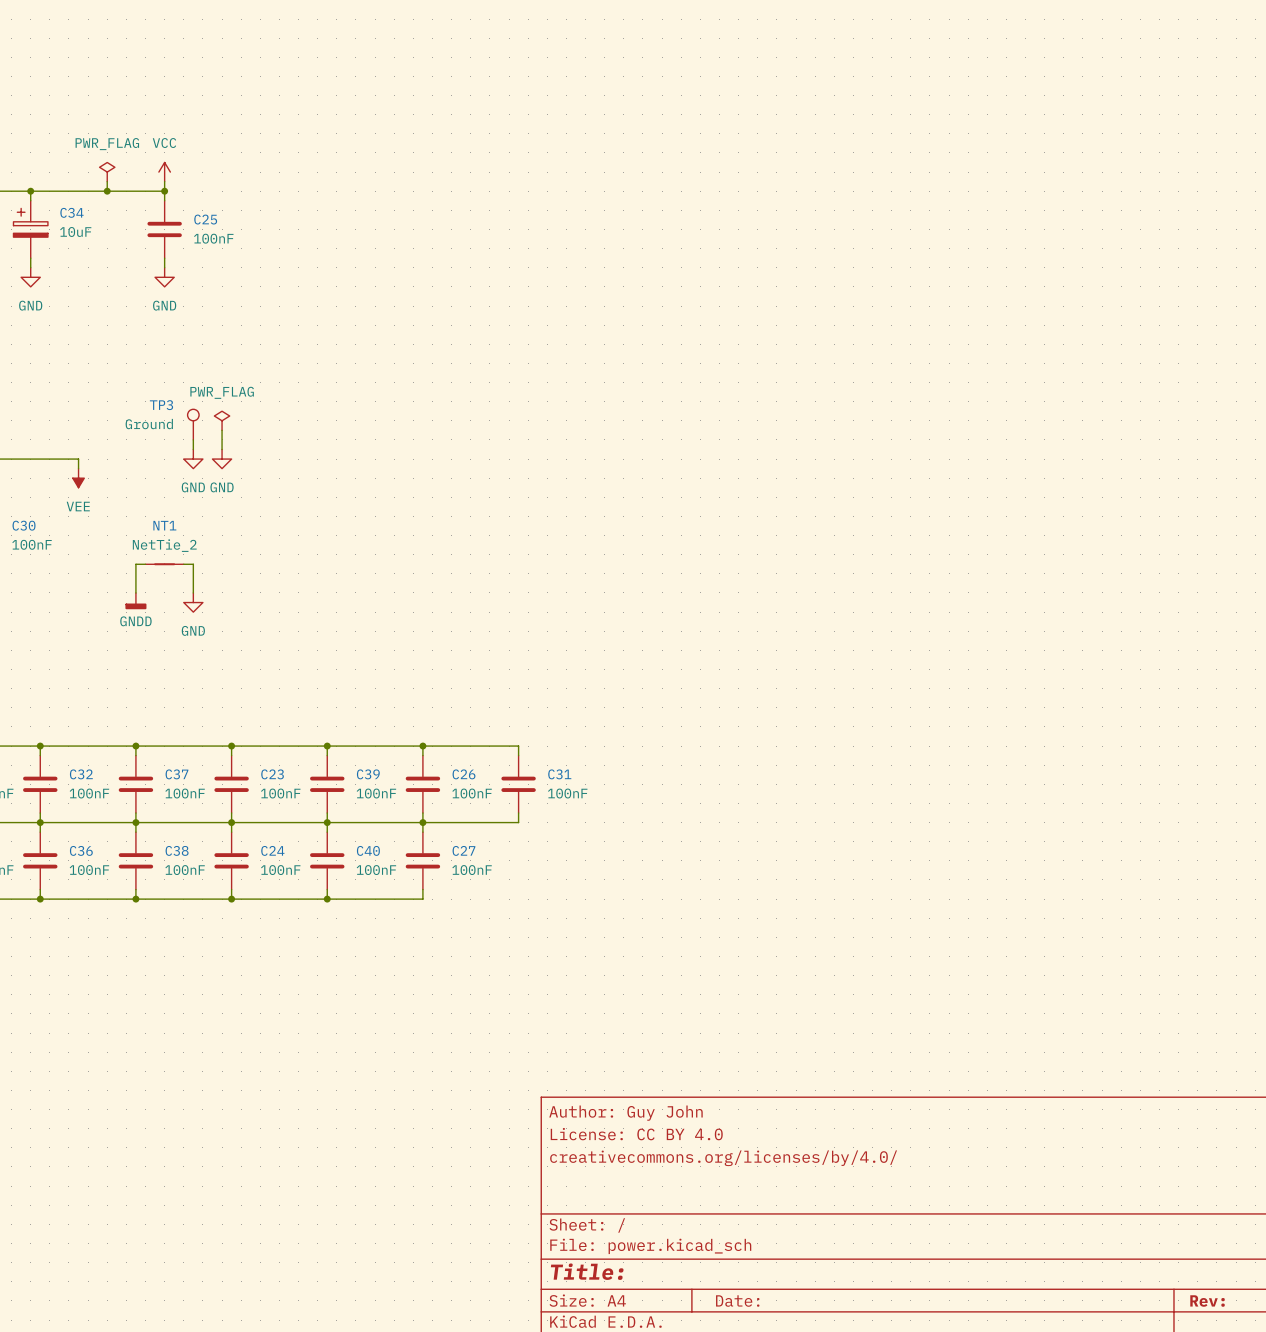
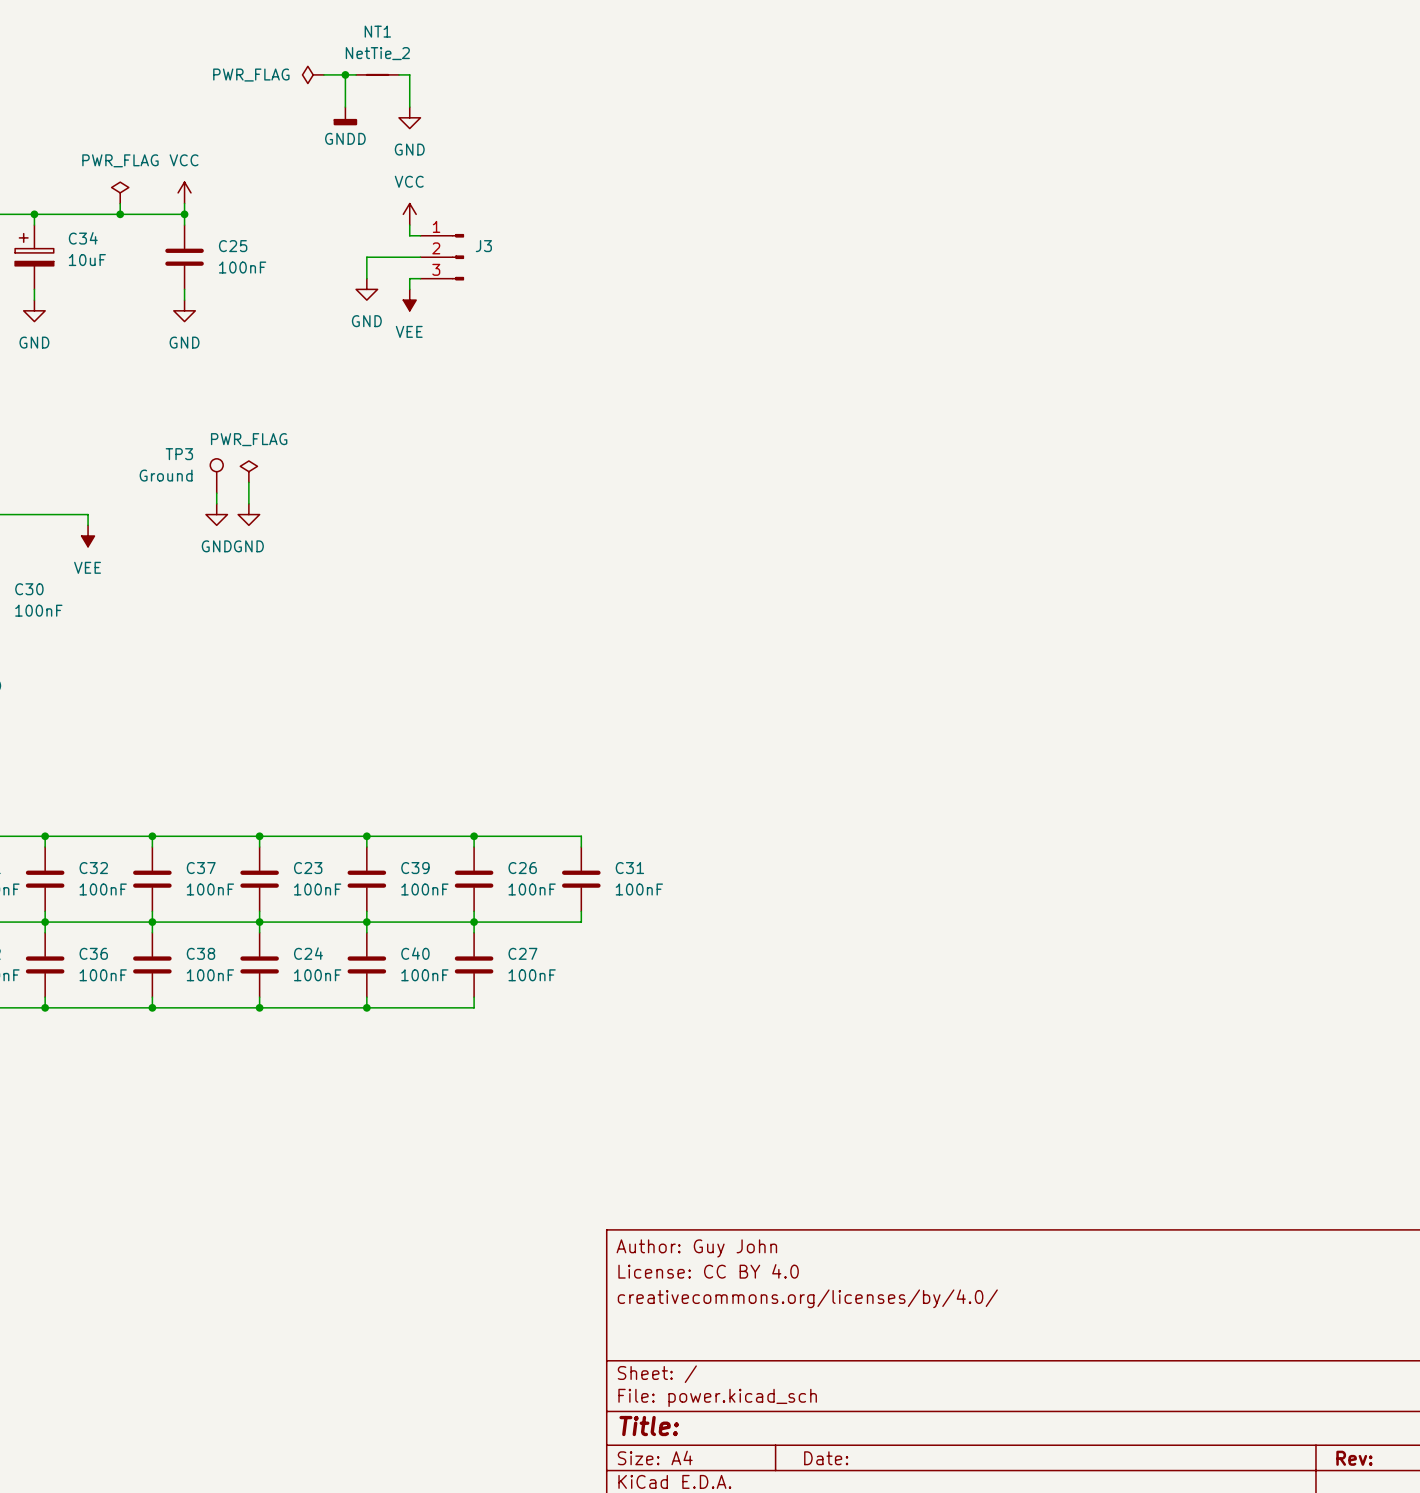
power symbol: none -> PWR_FLAG (313, 74)
wire: none -> (323, 74) (356, 74)
wire: none -> (345, 74) (345, 107)
junction: none -> (345, 74)
wire: none -> (399, 74) (409, 74) (409, 107)
power symbol: none -> GNDD (345, 116)
power symbol: none -> GND (409, 117)
power symbol: none -> VCC (409, 214)
wire: none -> (409, 225) (409, 235) (420, 235)
wire: none -> (420, 257) (366, 257) (366, 278)
J3: none -> (442, 257)
wire: none -> (420, 278) (409, 278) (409, 289)
power symbol: none -> GND (366, 289)
power symbol: none -> VEE (409, 300)
wire: (145, 564) (135, 564) (135, 592) -> none
NT1 position: (164, 564) -> (377, 74)
wire: (183, 564) (193, 564) (193, 592) -> none
power symbol: GNDD (135, 601) -> none
power symbol: GND (193, 602) -> none

